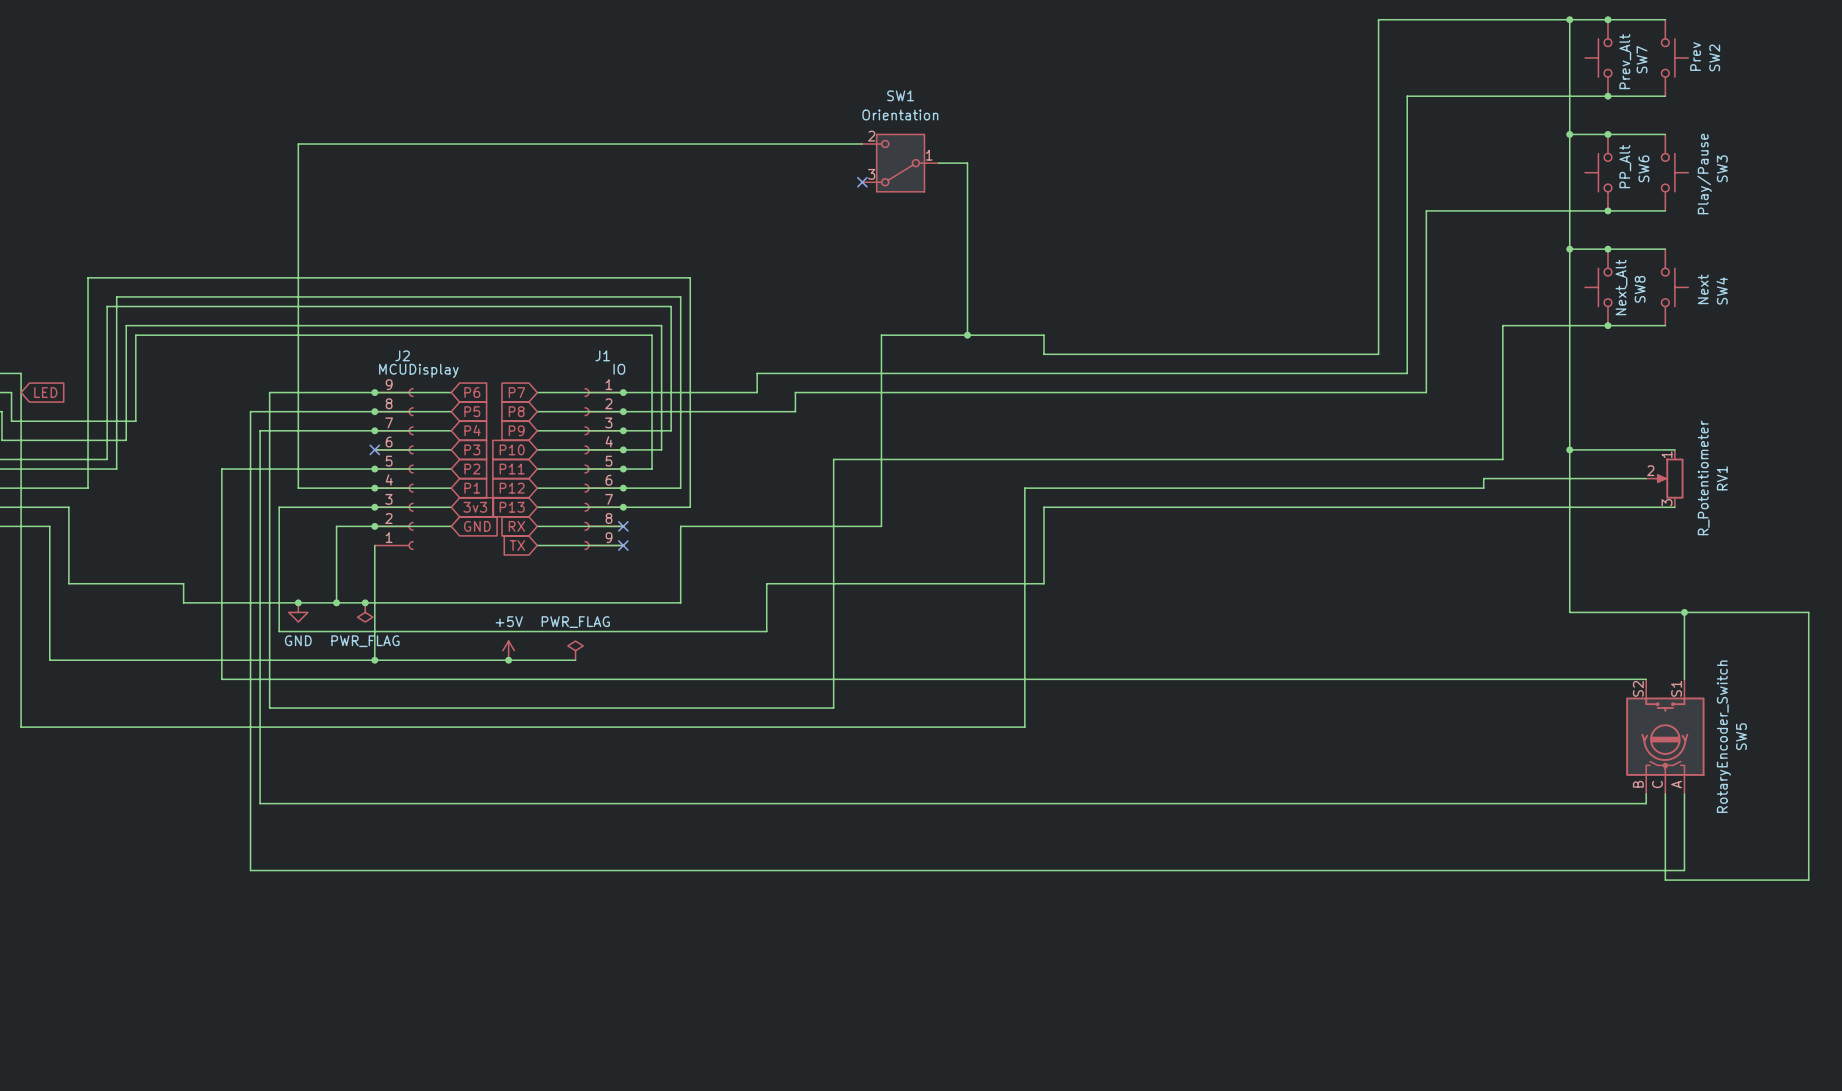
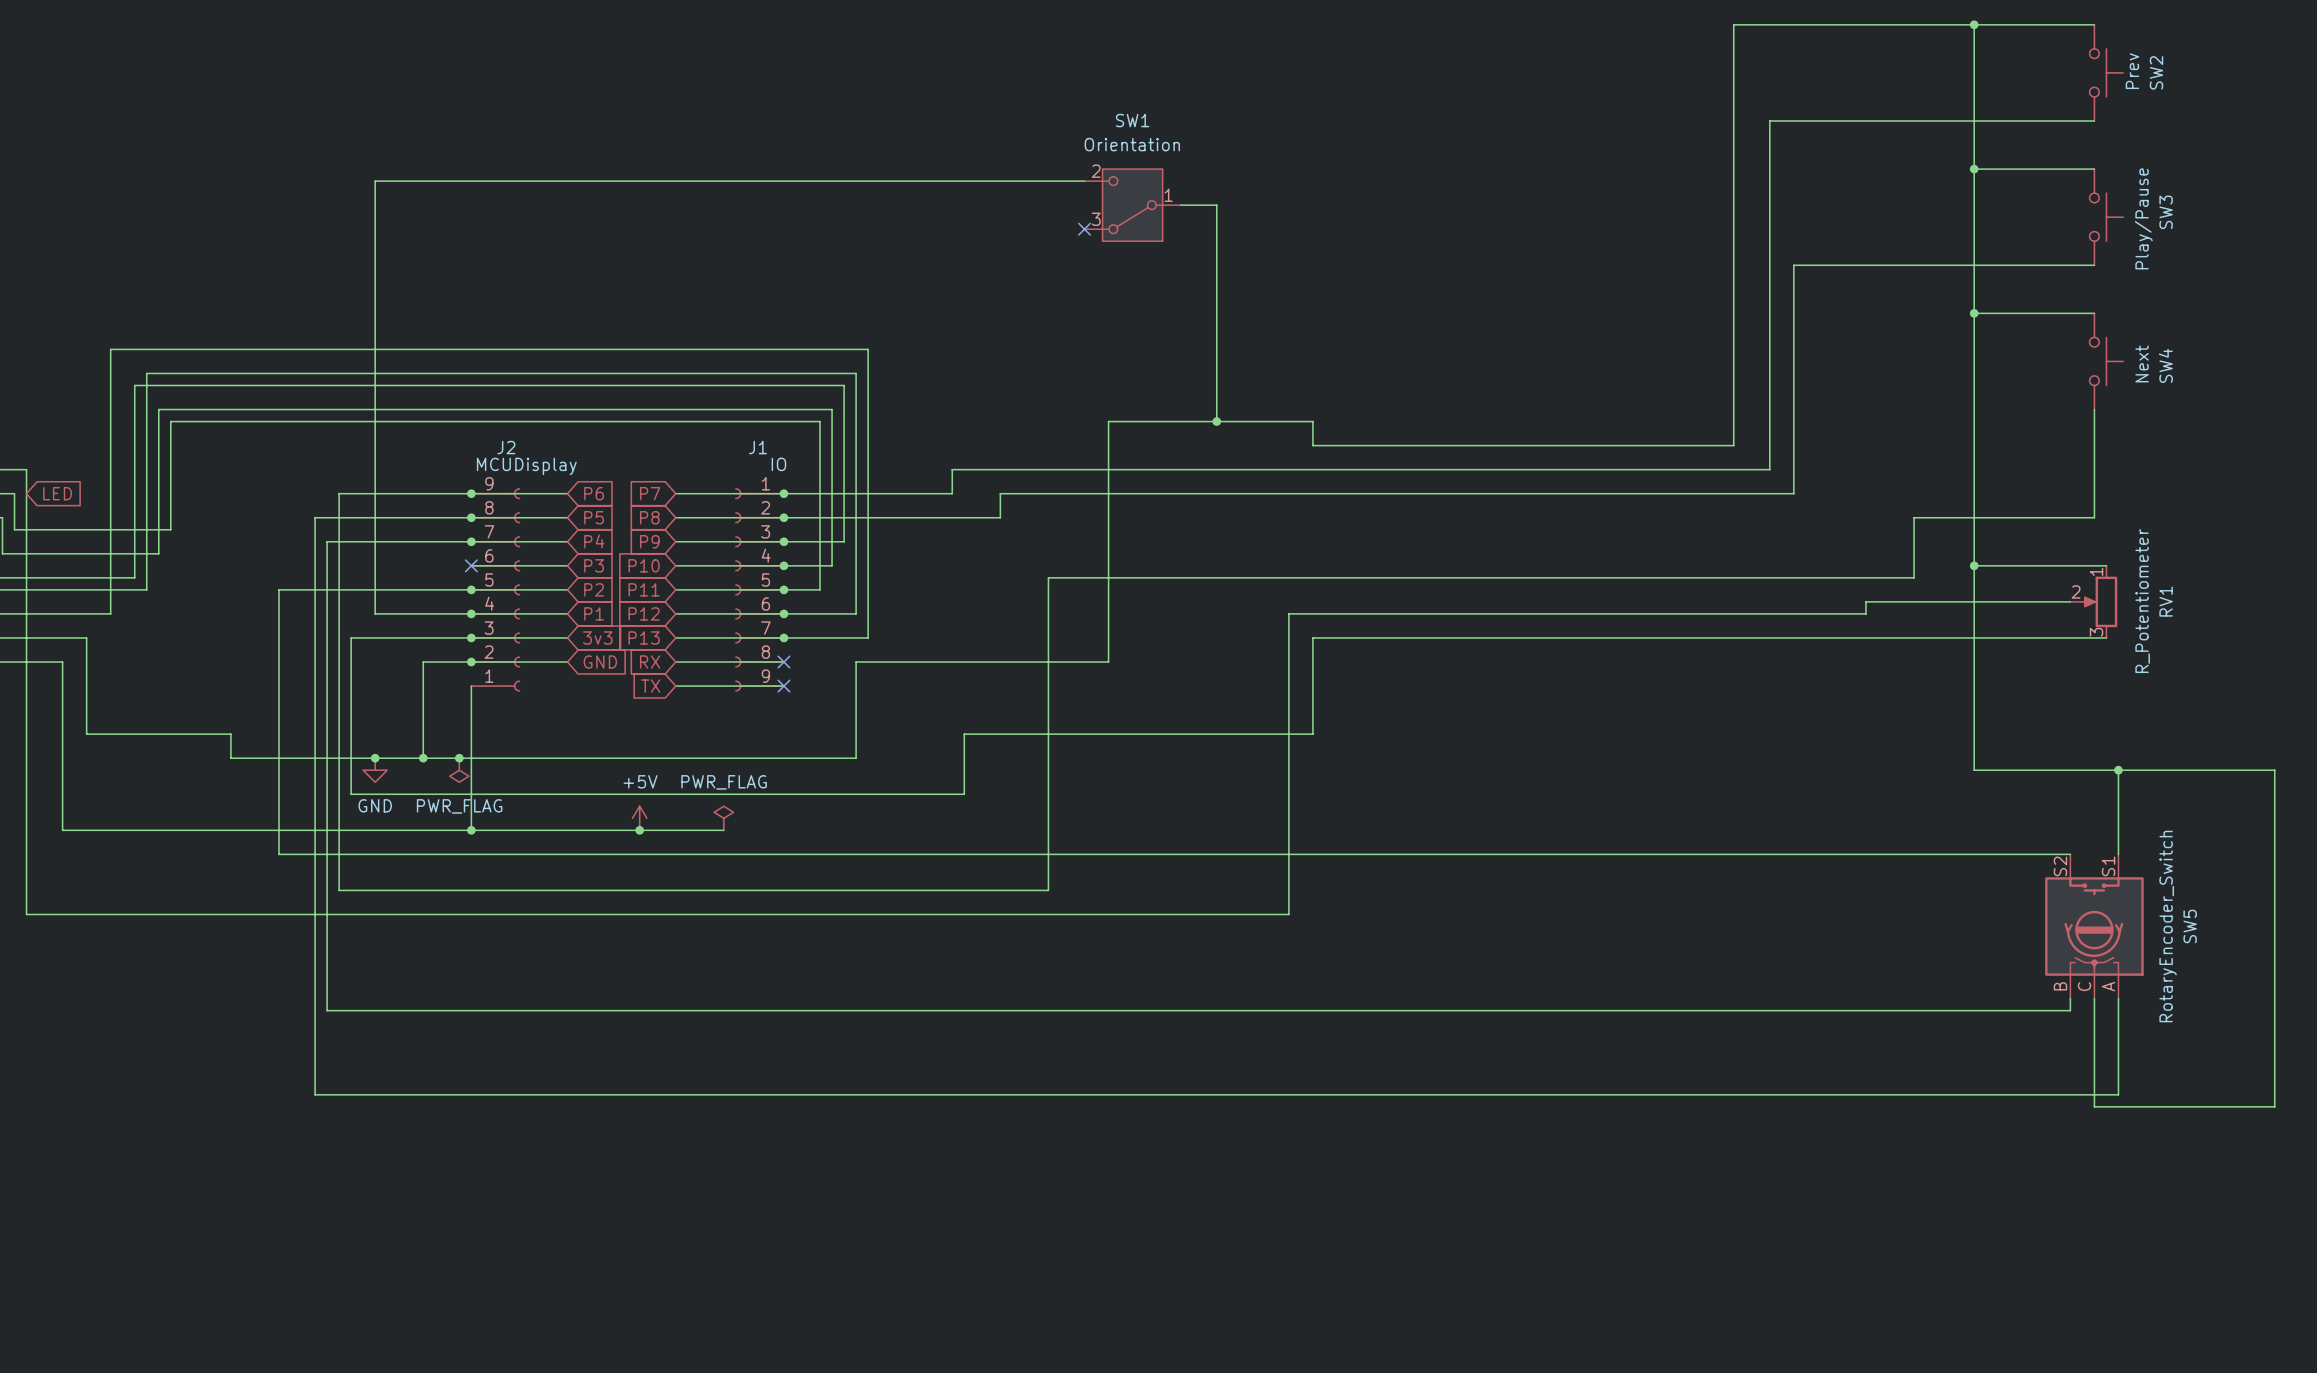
junction: (1607, 19) -> none
SW7: Prev_Alt (1598, 57) -> none
junction: (1607, 96) -> none
junction: (1607, 134) -> none
SW6: PP_Alt (1598, 172) -> none
junction: (1607, 210) -> none
junction: (1607, 249) -> none
SW8: Next_Alt (1598, 287) -> none
junction: (1607, 325) -> none
wire: (1665, 325) (1502, 325) (1502, 459) -> (2094, 409) (2094, 517) (1914, 517) (1914, 577) (1890, 577)

